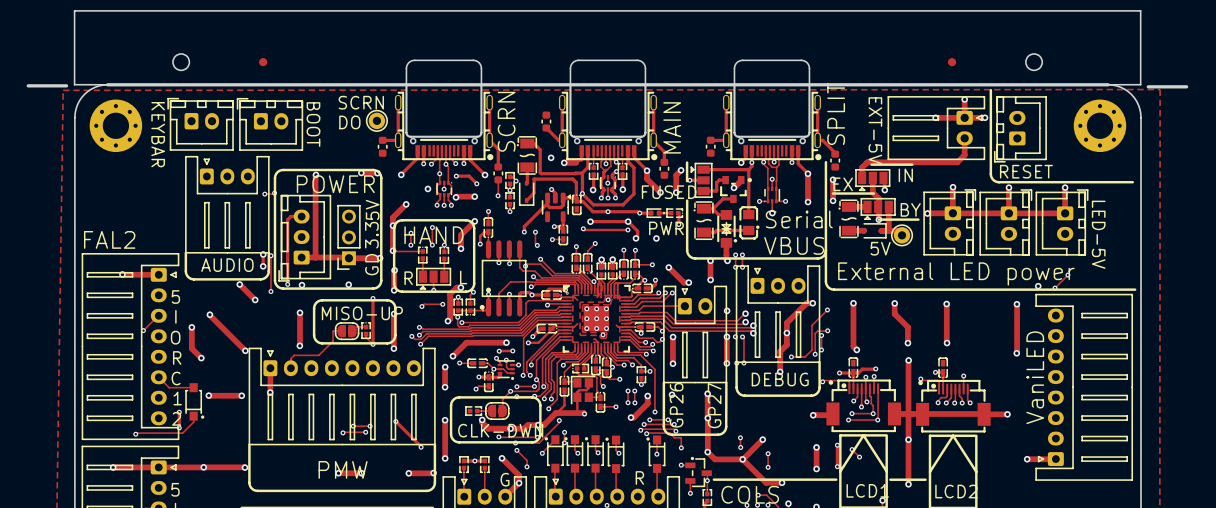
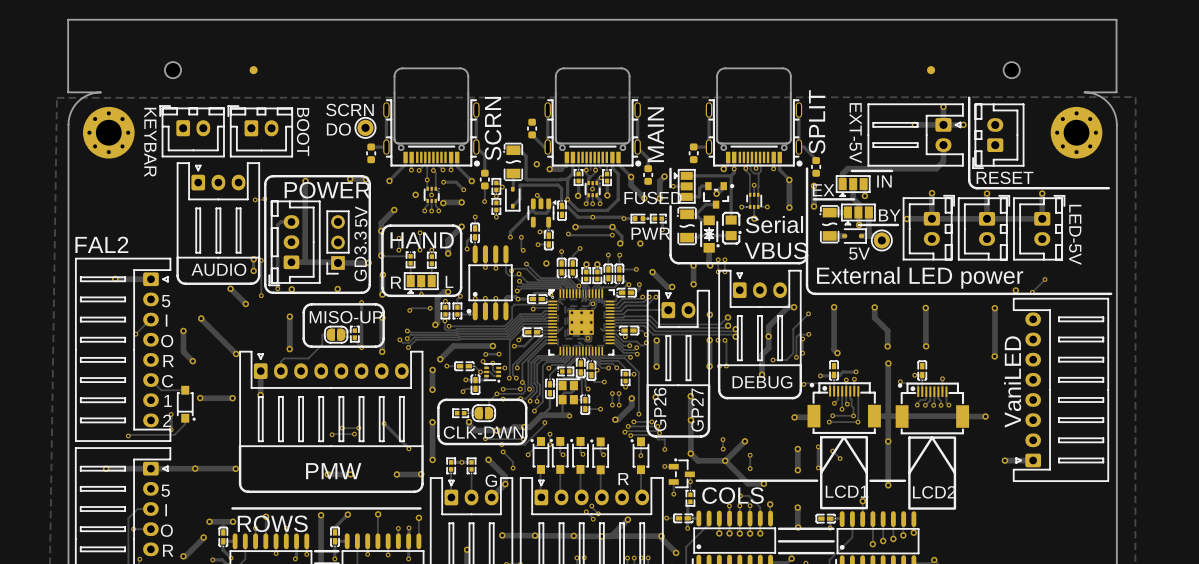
board edge: (107, 84) (1108, 84) -> none
board edge: (28, 85) (66, 85) -> none
board edge: (1148, 86) (1186, 86) -> none
via: (616, 162) -> none
via: none -> (586, 170)
via: (605, 163) -> none
via: none -> (595, 170)
via: none -> (519, 273)
track: (531, 281) (510, 281) (498, 294) -> none
via: none -> (485, 298)

